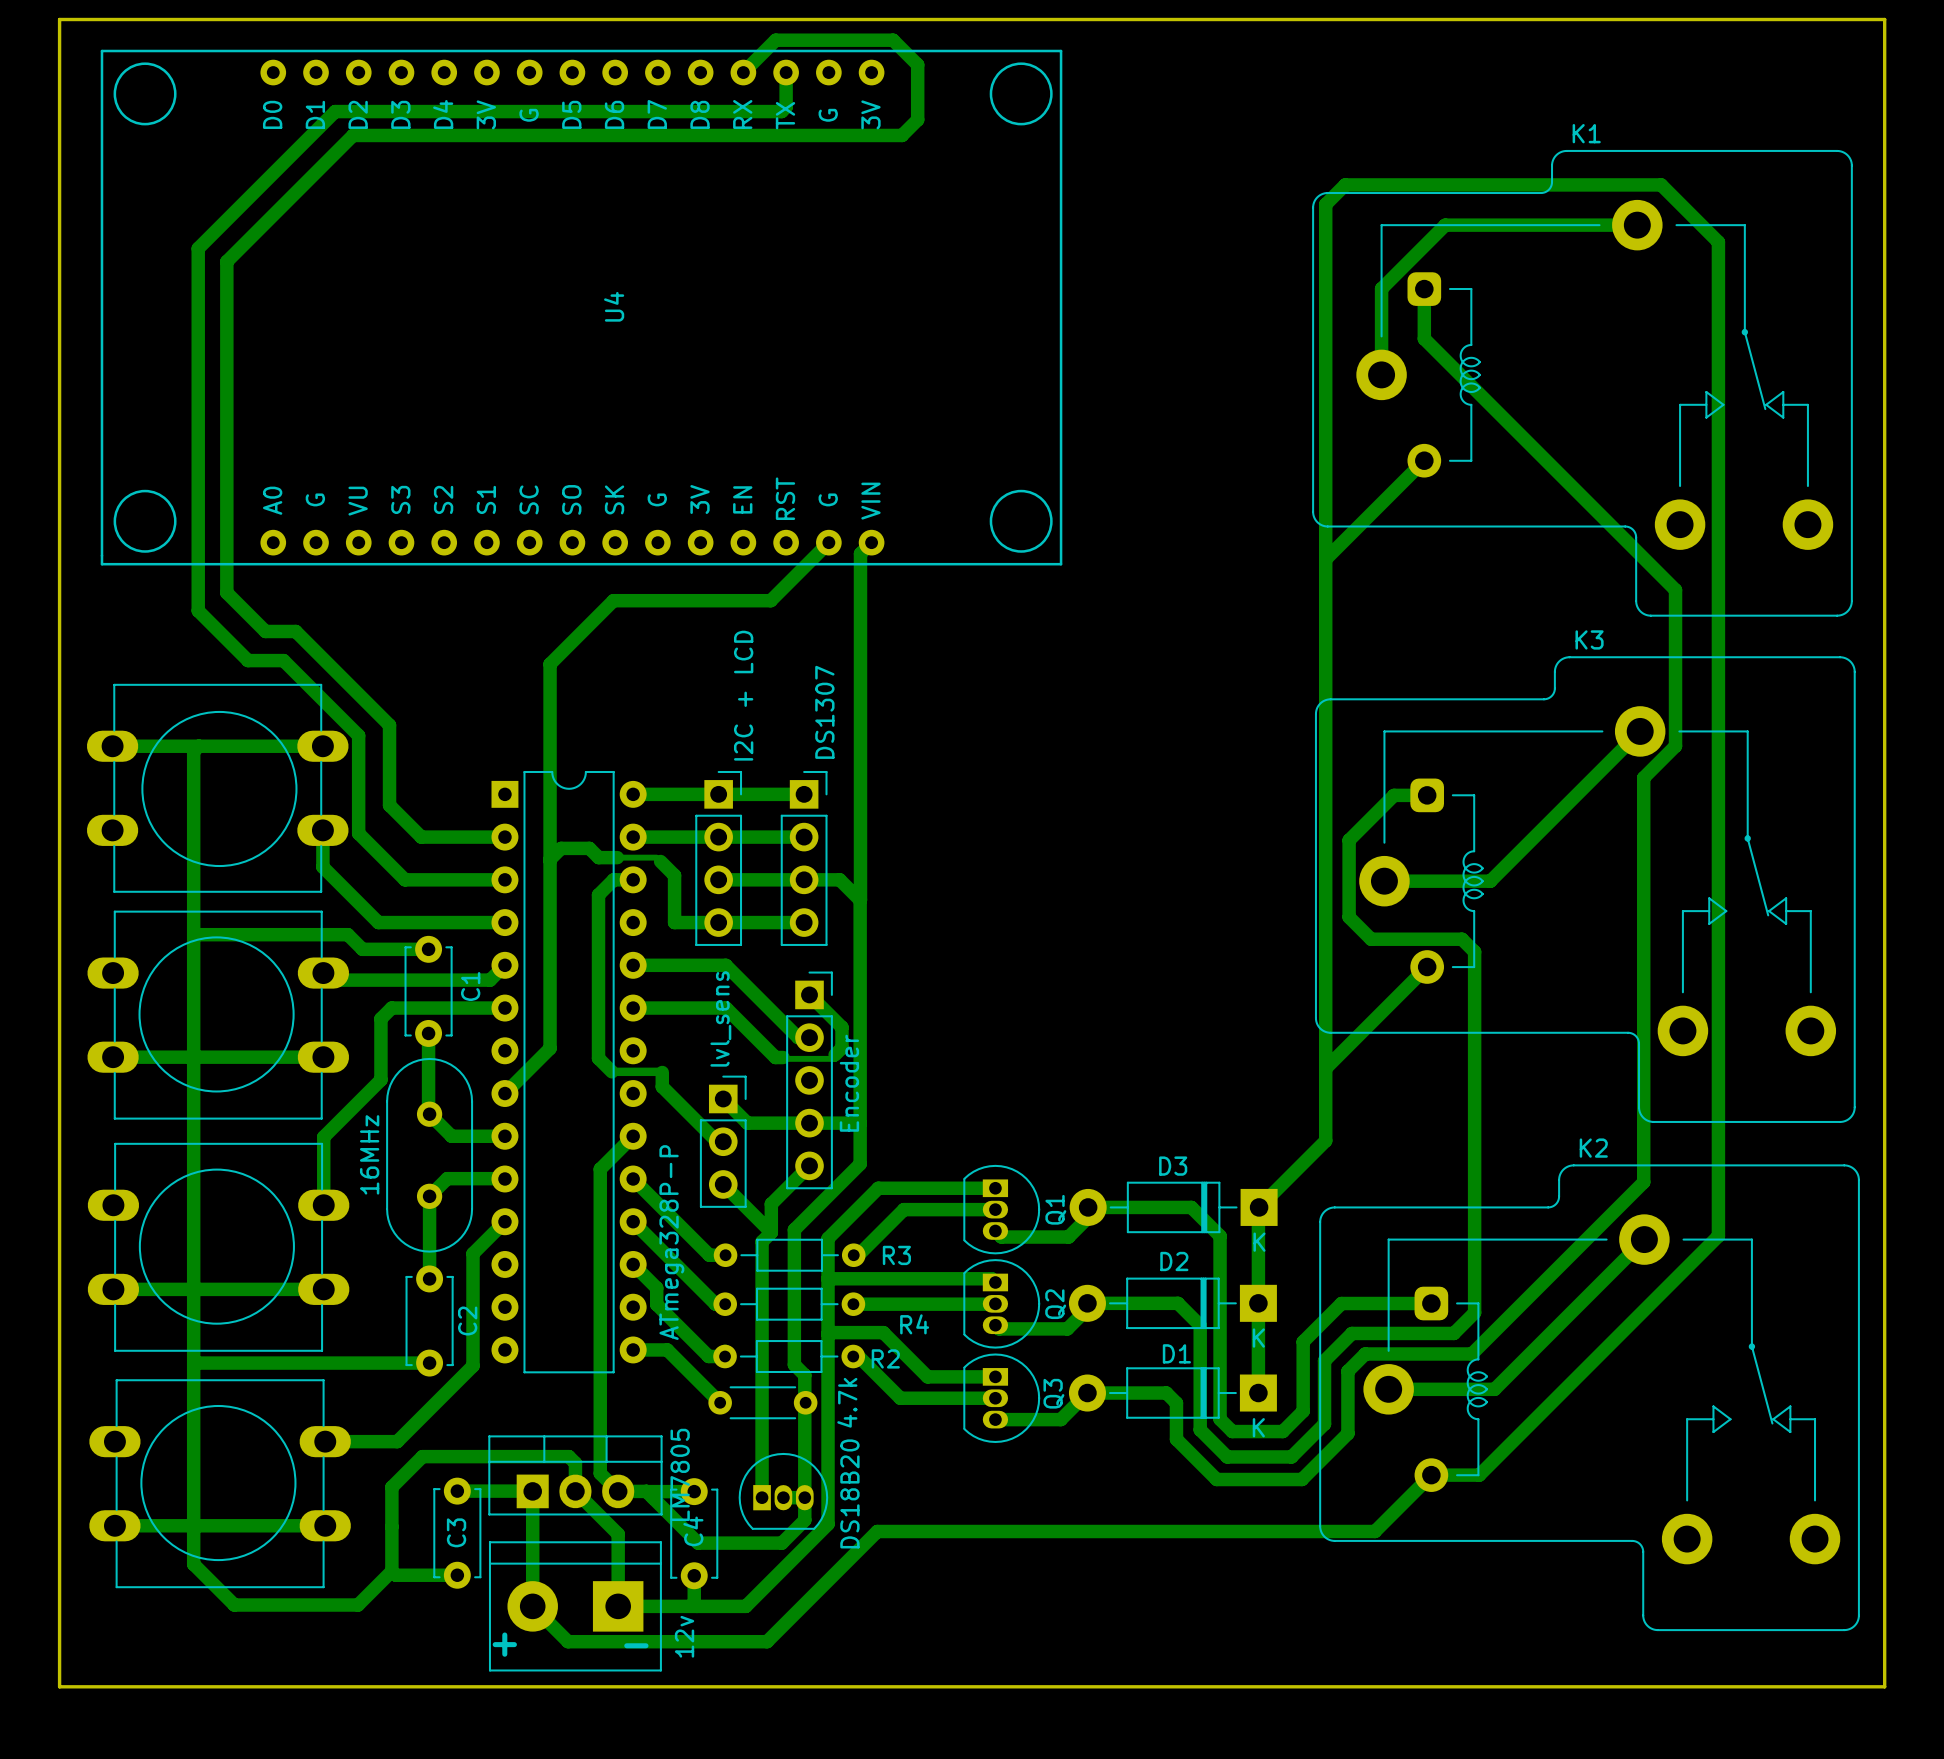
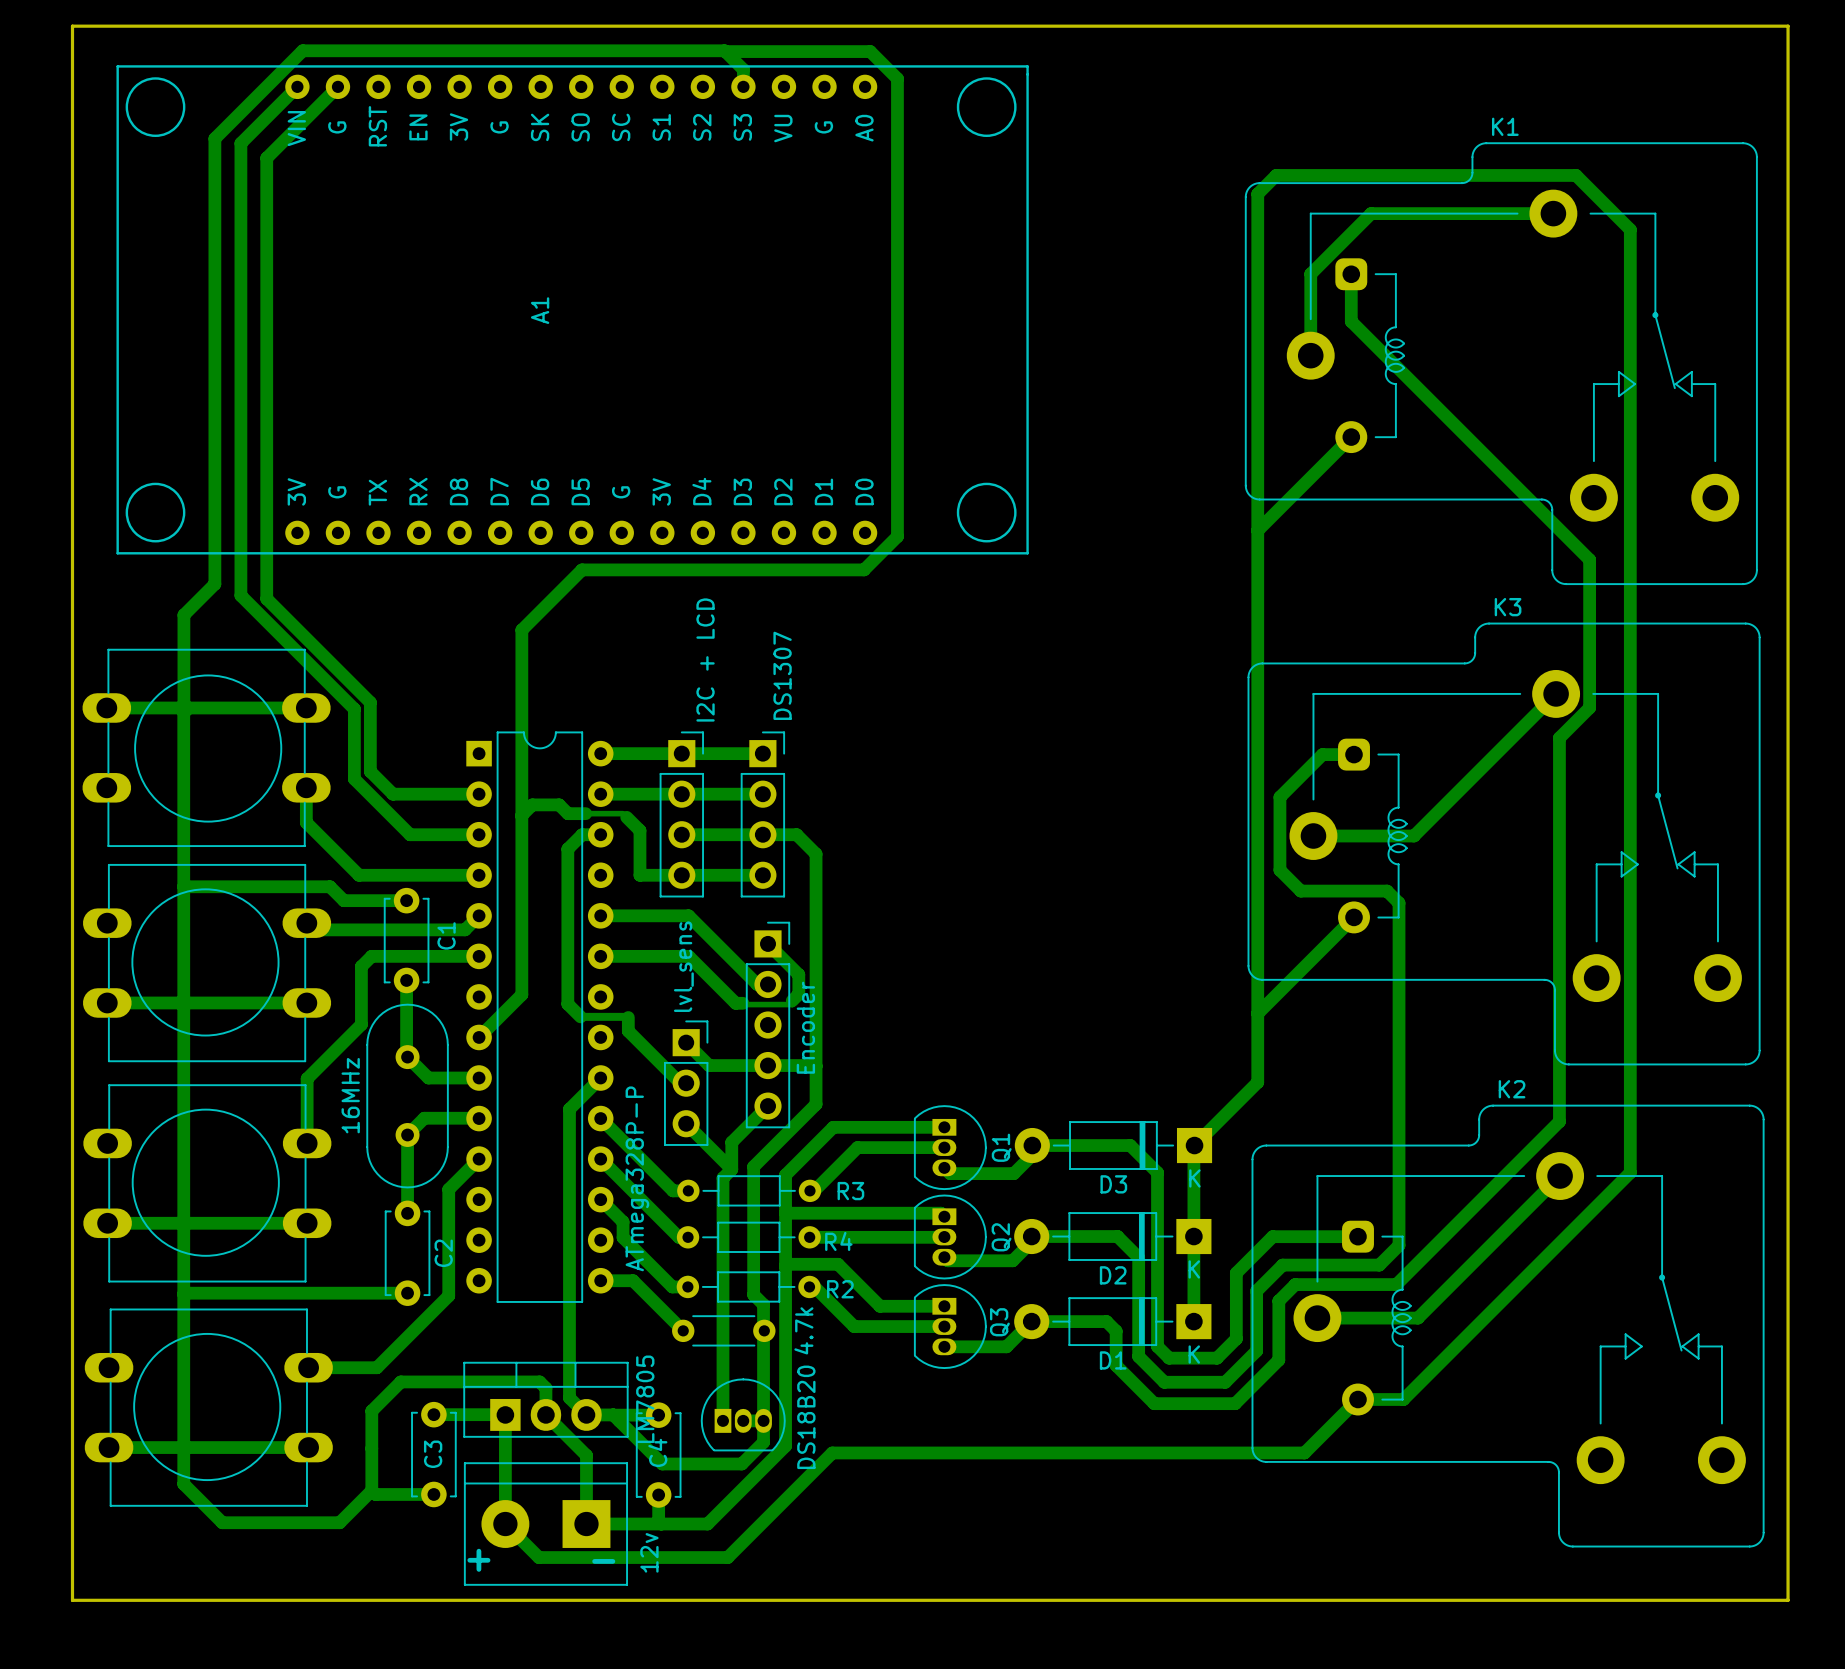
board edge: (1884, 27) (1884, 19) (59, 19) (59, 1686) (76, 1686) -> (1788, 26) (72, 26) (72, 1600)
bottom track: (743, 72) (775, 40) (893, 40) (917, 64) (917, 119) (902, 135) (353, 135) (226, 261) (226, 592) (265, 631) (295, 631) (389, 725) (389, 805) (421, 837) -> (337, 86) (266, 158) (266, 598) (370, 702) (370, 771) (393, 794) (399, 794)
bottom track: (786, 72) (786, 107) (781, 111) (335, 111) (198, 248) (198, 610) (248, 660) (283, 660) (358, 735) (358, 833) (405, 879) (432, 879) -> (297, 86) (240, 143) (240, 595) (354, 709) (354, 779) (410, 834)
bottom track: none -> (743, 86) (743, 69) (724, 50) (302, 50) (214, 138) (214, 584) (183, 615) (183, 710)
U4: (581, 307) -> none
A1: none -> (572, 309)
bottom track: (828, 542) (770, 600) -> (724, 51) (870, 51) (897, 78) (897, 536) (864, 569) (731, 569)
bottom track: (871, 542) (860, 553) (860, 900) -> none
D3 name position: D3 (1173, 1166) -> D3 (1113, 1184)
D2 name position: D2 (1174, 1261) -> D2 (1113, 1275)
R4 name position: R4 (914, 1324) -> R4 (838, 1241)
D1 name position: D1 (1176, 1353) -> D1 (1113, 1360)

